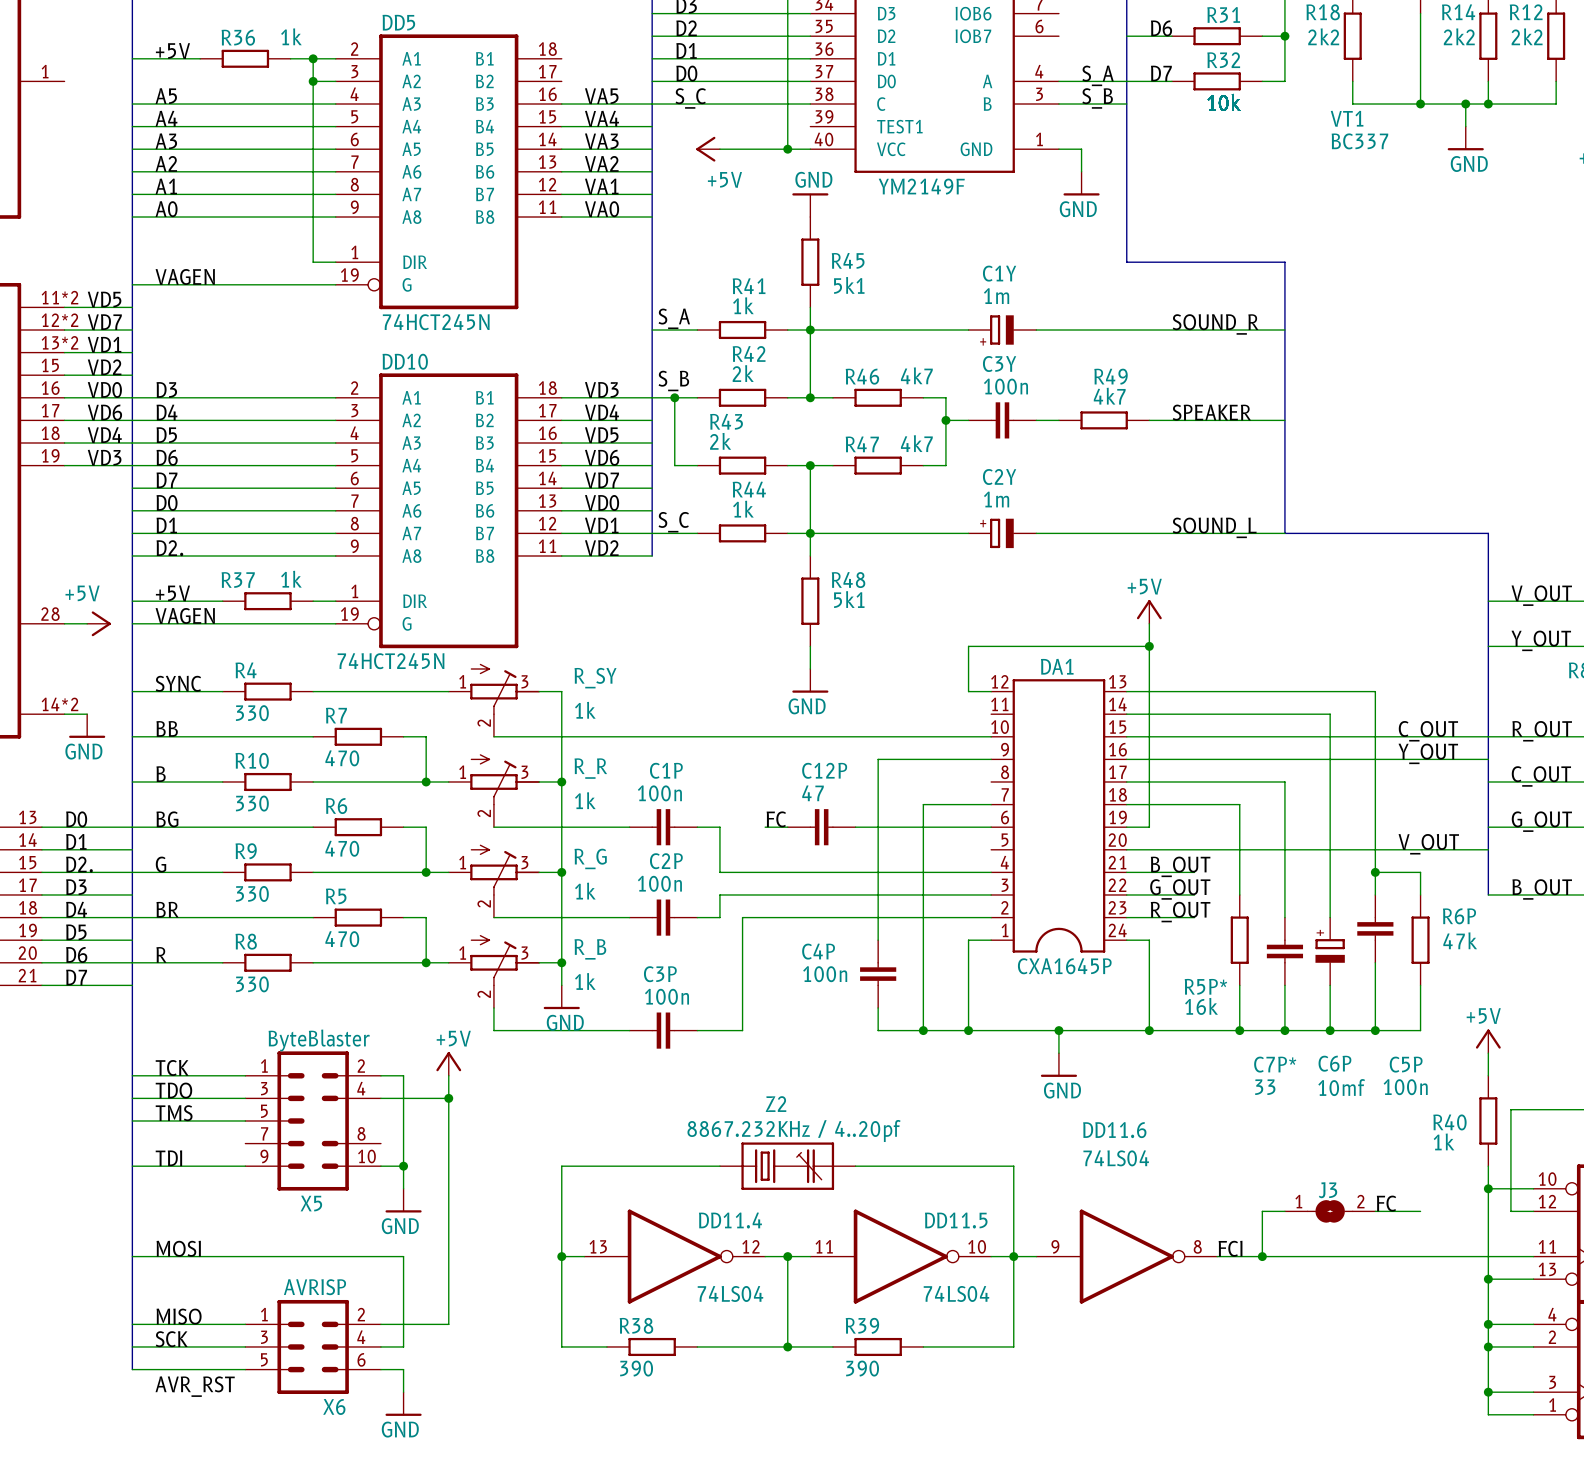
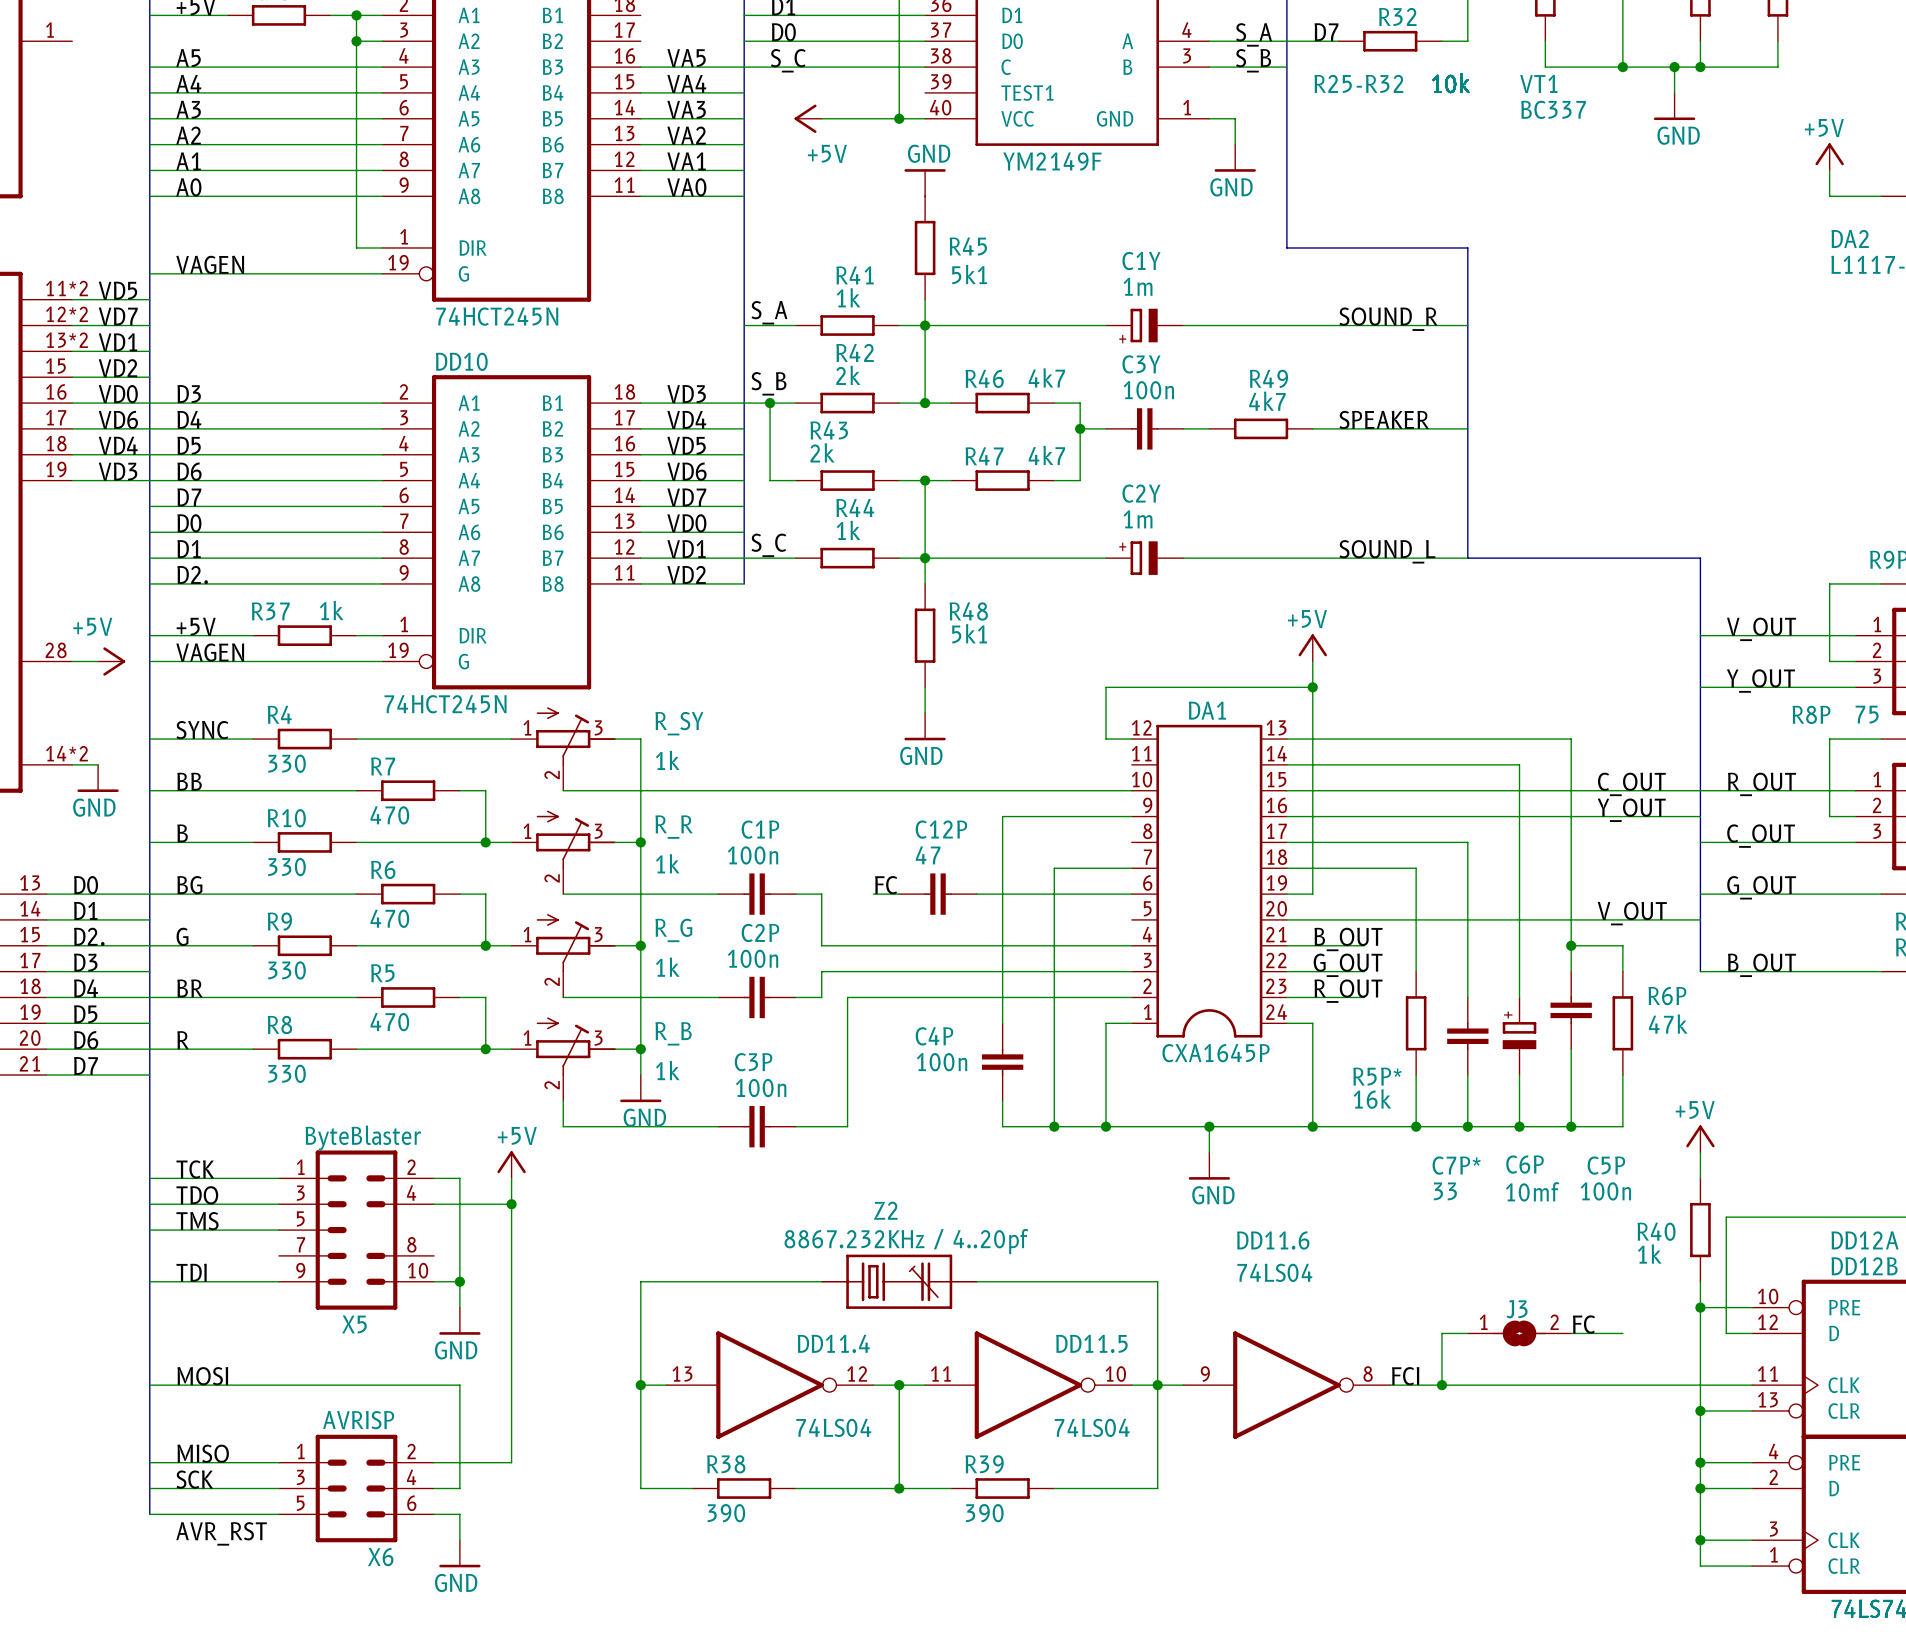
part value position: 10k (1224, 102) -> 10k (1451, 83)
part value position: 10k (1224, 102) -> 10k (1451, 83)
part value position: 10k (1224, 102) -> 10k (1451, 83)
part value position: 10k (1224, 102) -> 10k (1451, 83)
part value position: 10k (1224, 102) -> 10k (1451, 83)
part value position: 10k (1224, 102) -> 10k (1451, 83)
R31 value position: 10k (1224, 102) -> 10k (1451, 83)
R32 value position: 10k (1224, 102) -> 10k (1451, 83)
text: none -> R25-R32 (1358, 83)

